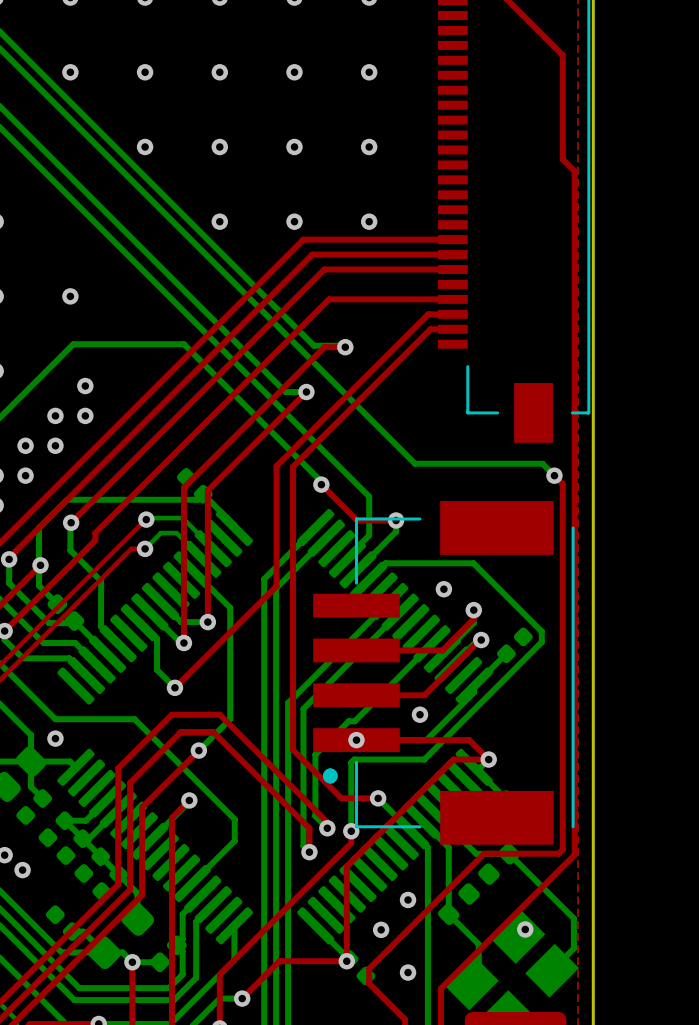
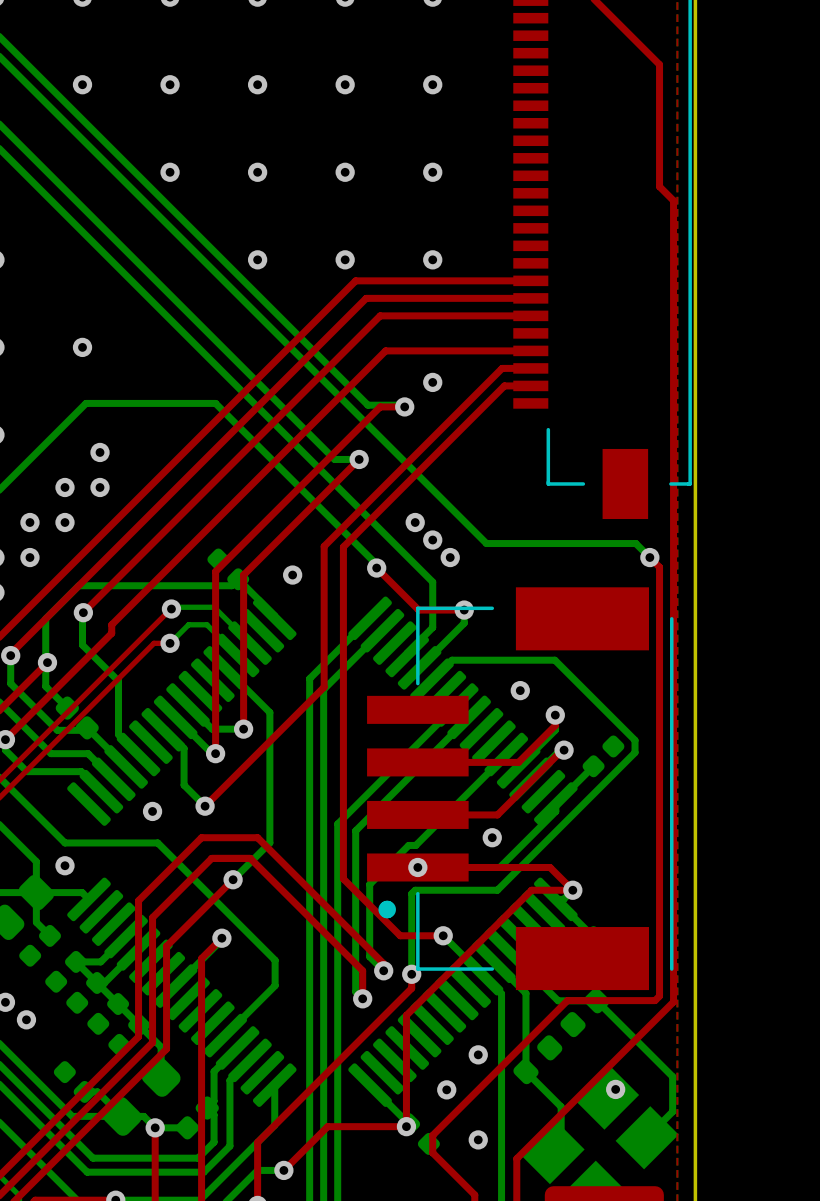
via: none -> (432, 382)
via: none -> (415, 522)
via: none -> (432, 540)
via: none -> (450, 557)
via: none -> (292, 575)
via: none -> (152, 811)

